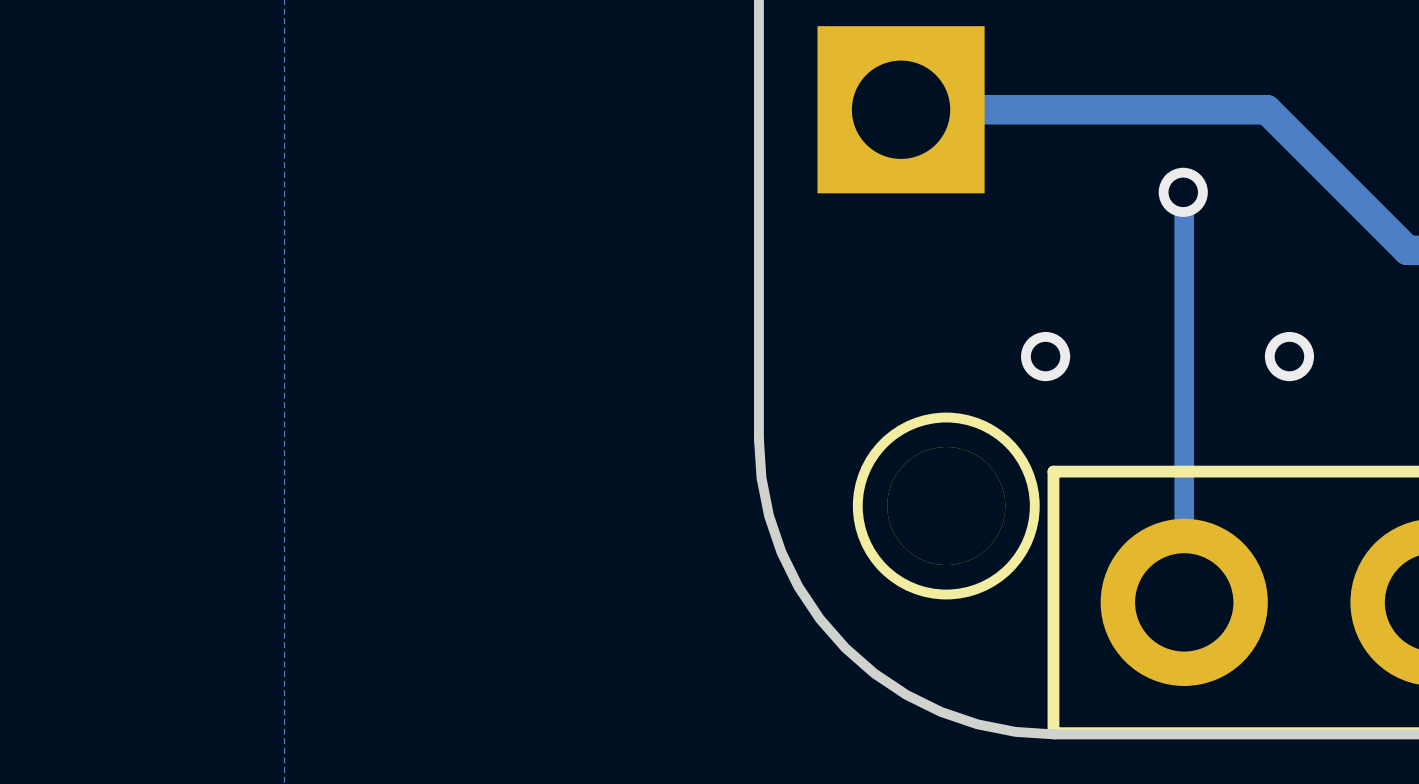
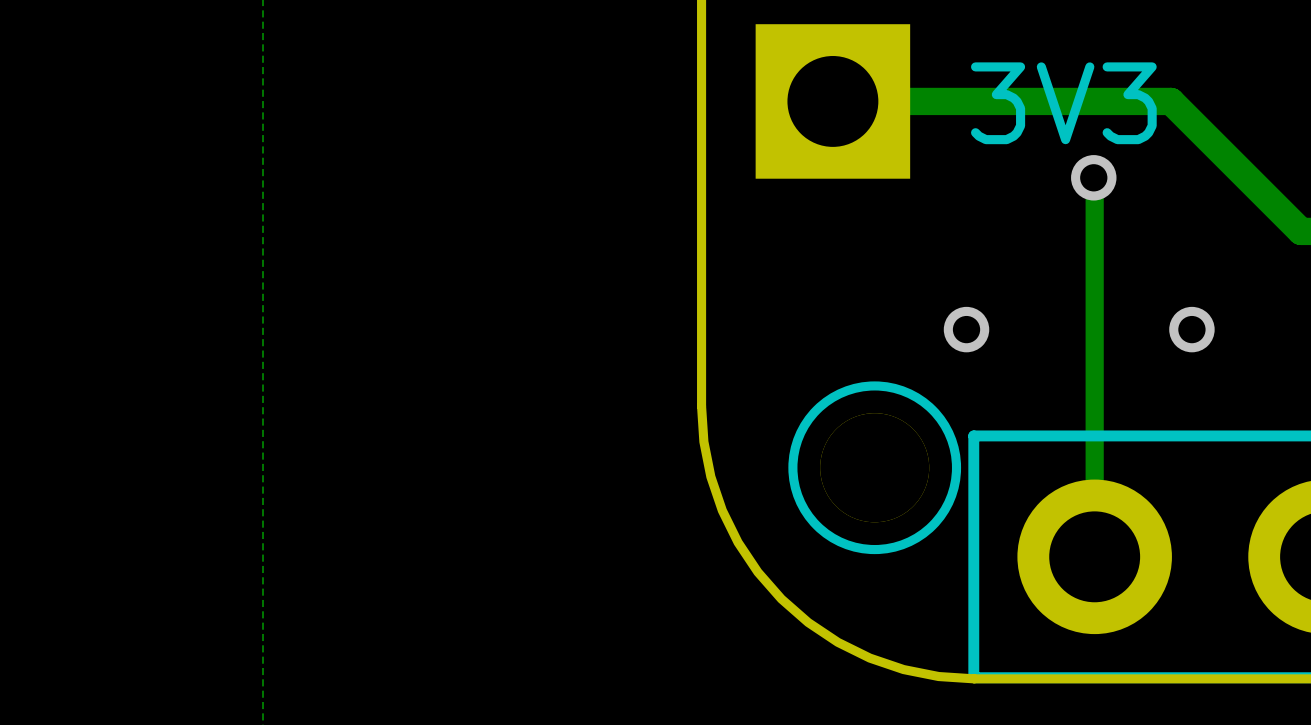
text: none -> 3V3 (1063, 103)

